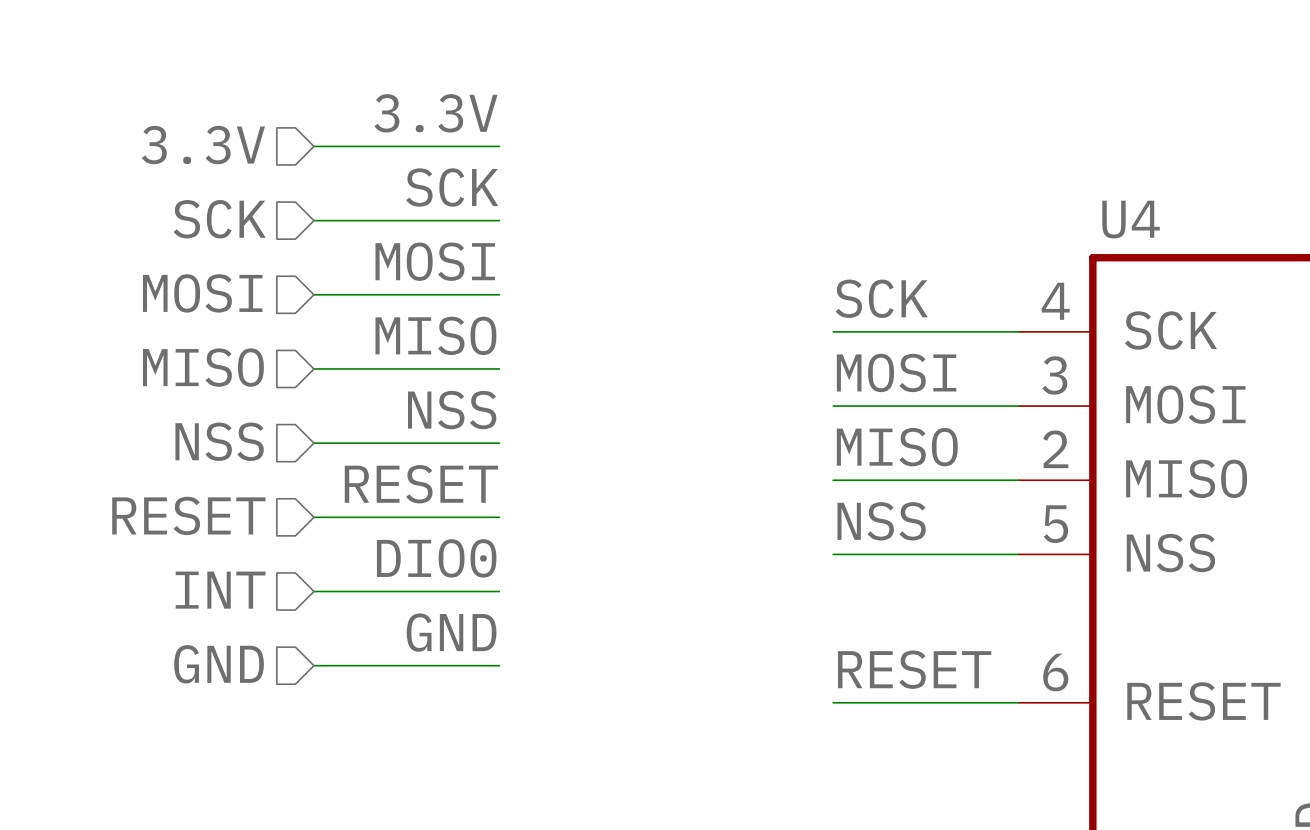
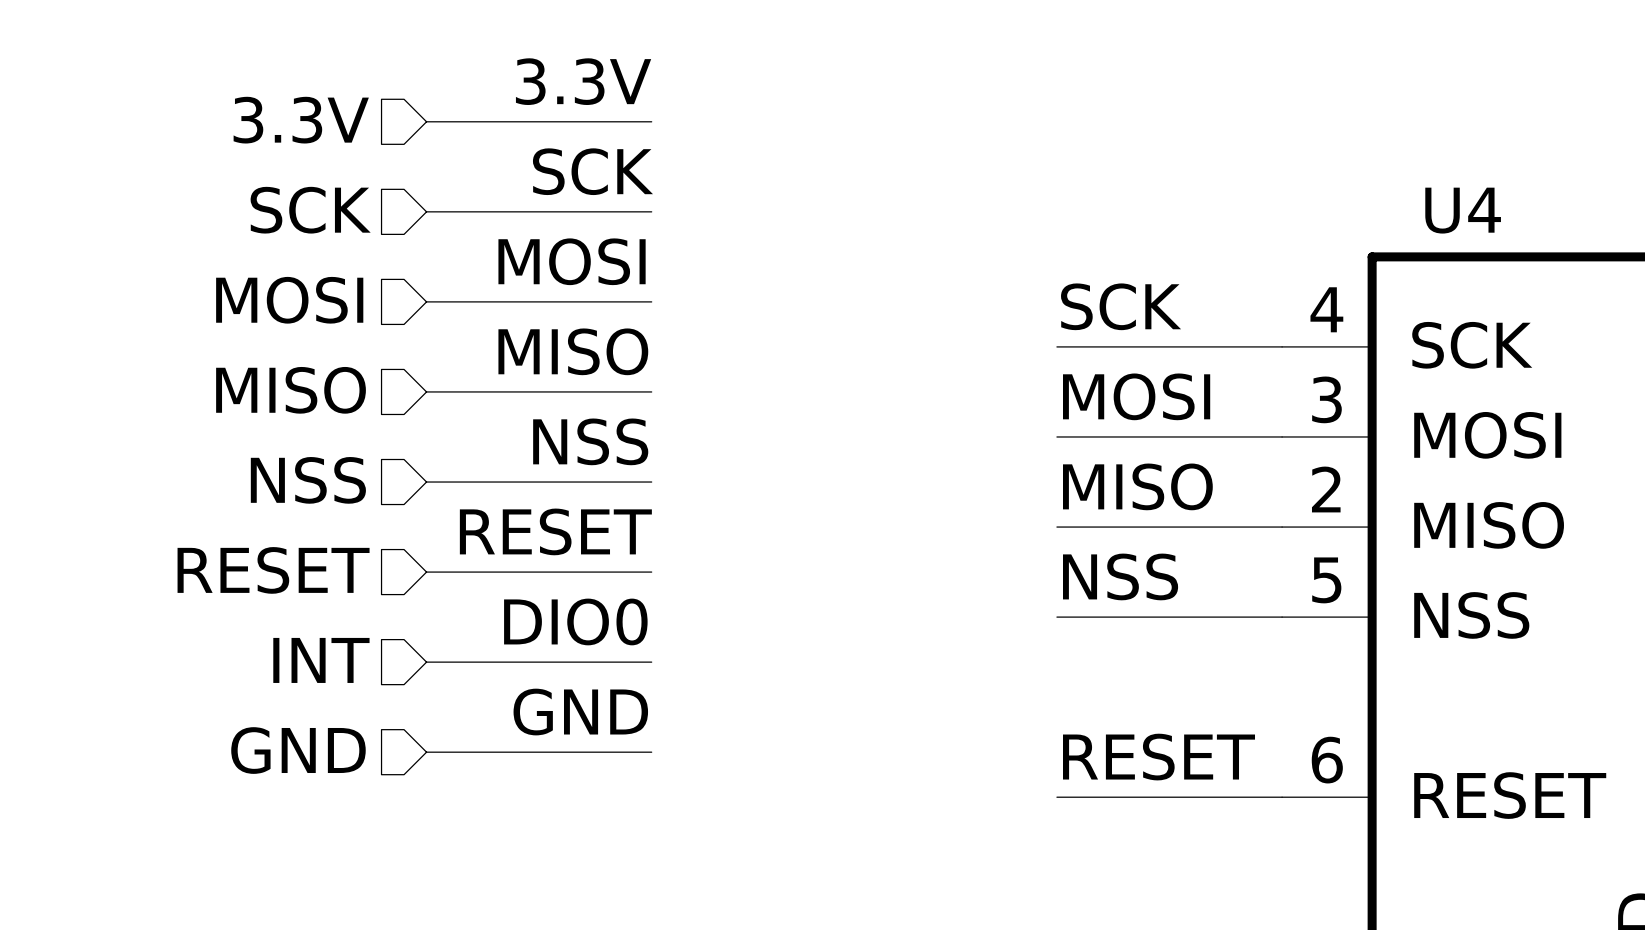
U4 name position: U4 (1131, 219) -> U4 (1463, 210)

